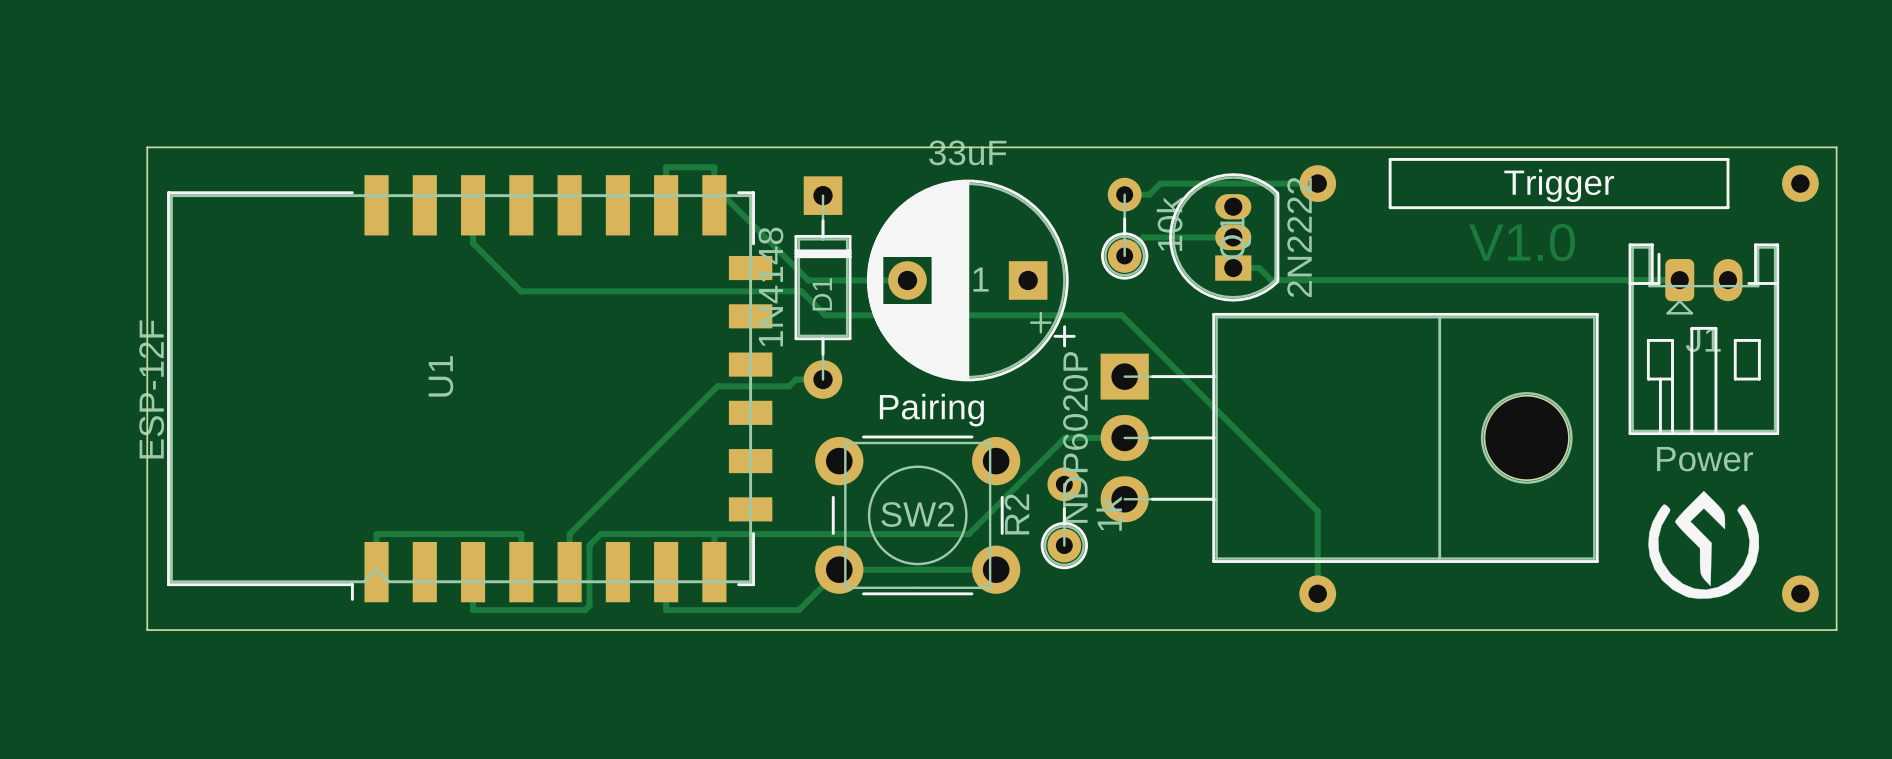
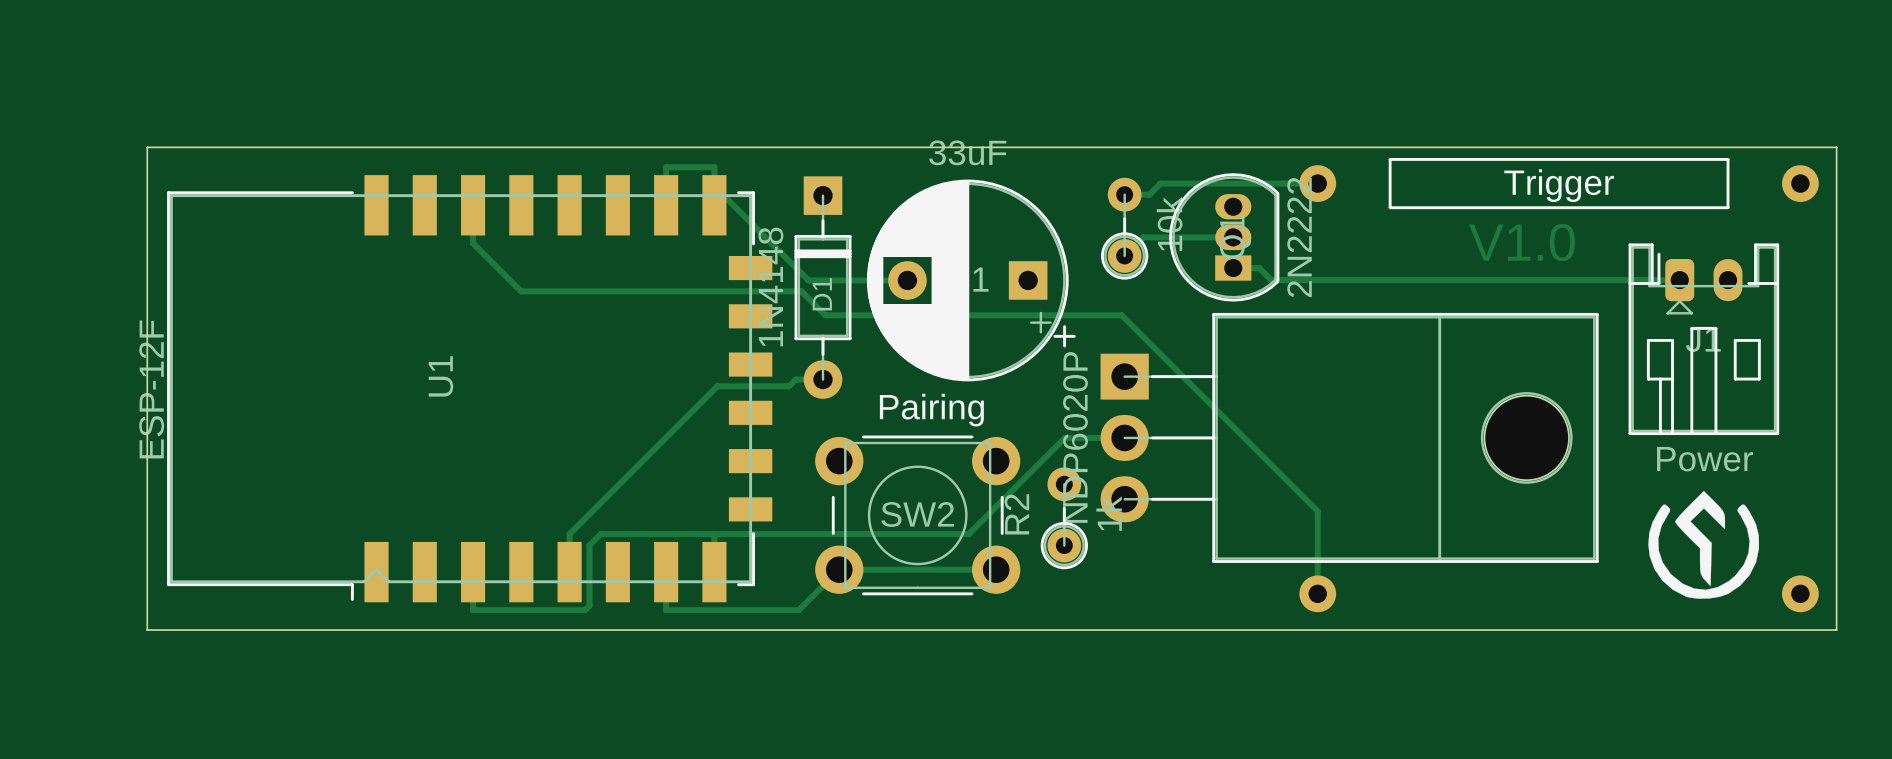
track: (376, 572) (376, 534) (521, 534) (521, 572) -> none

